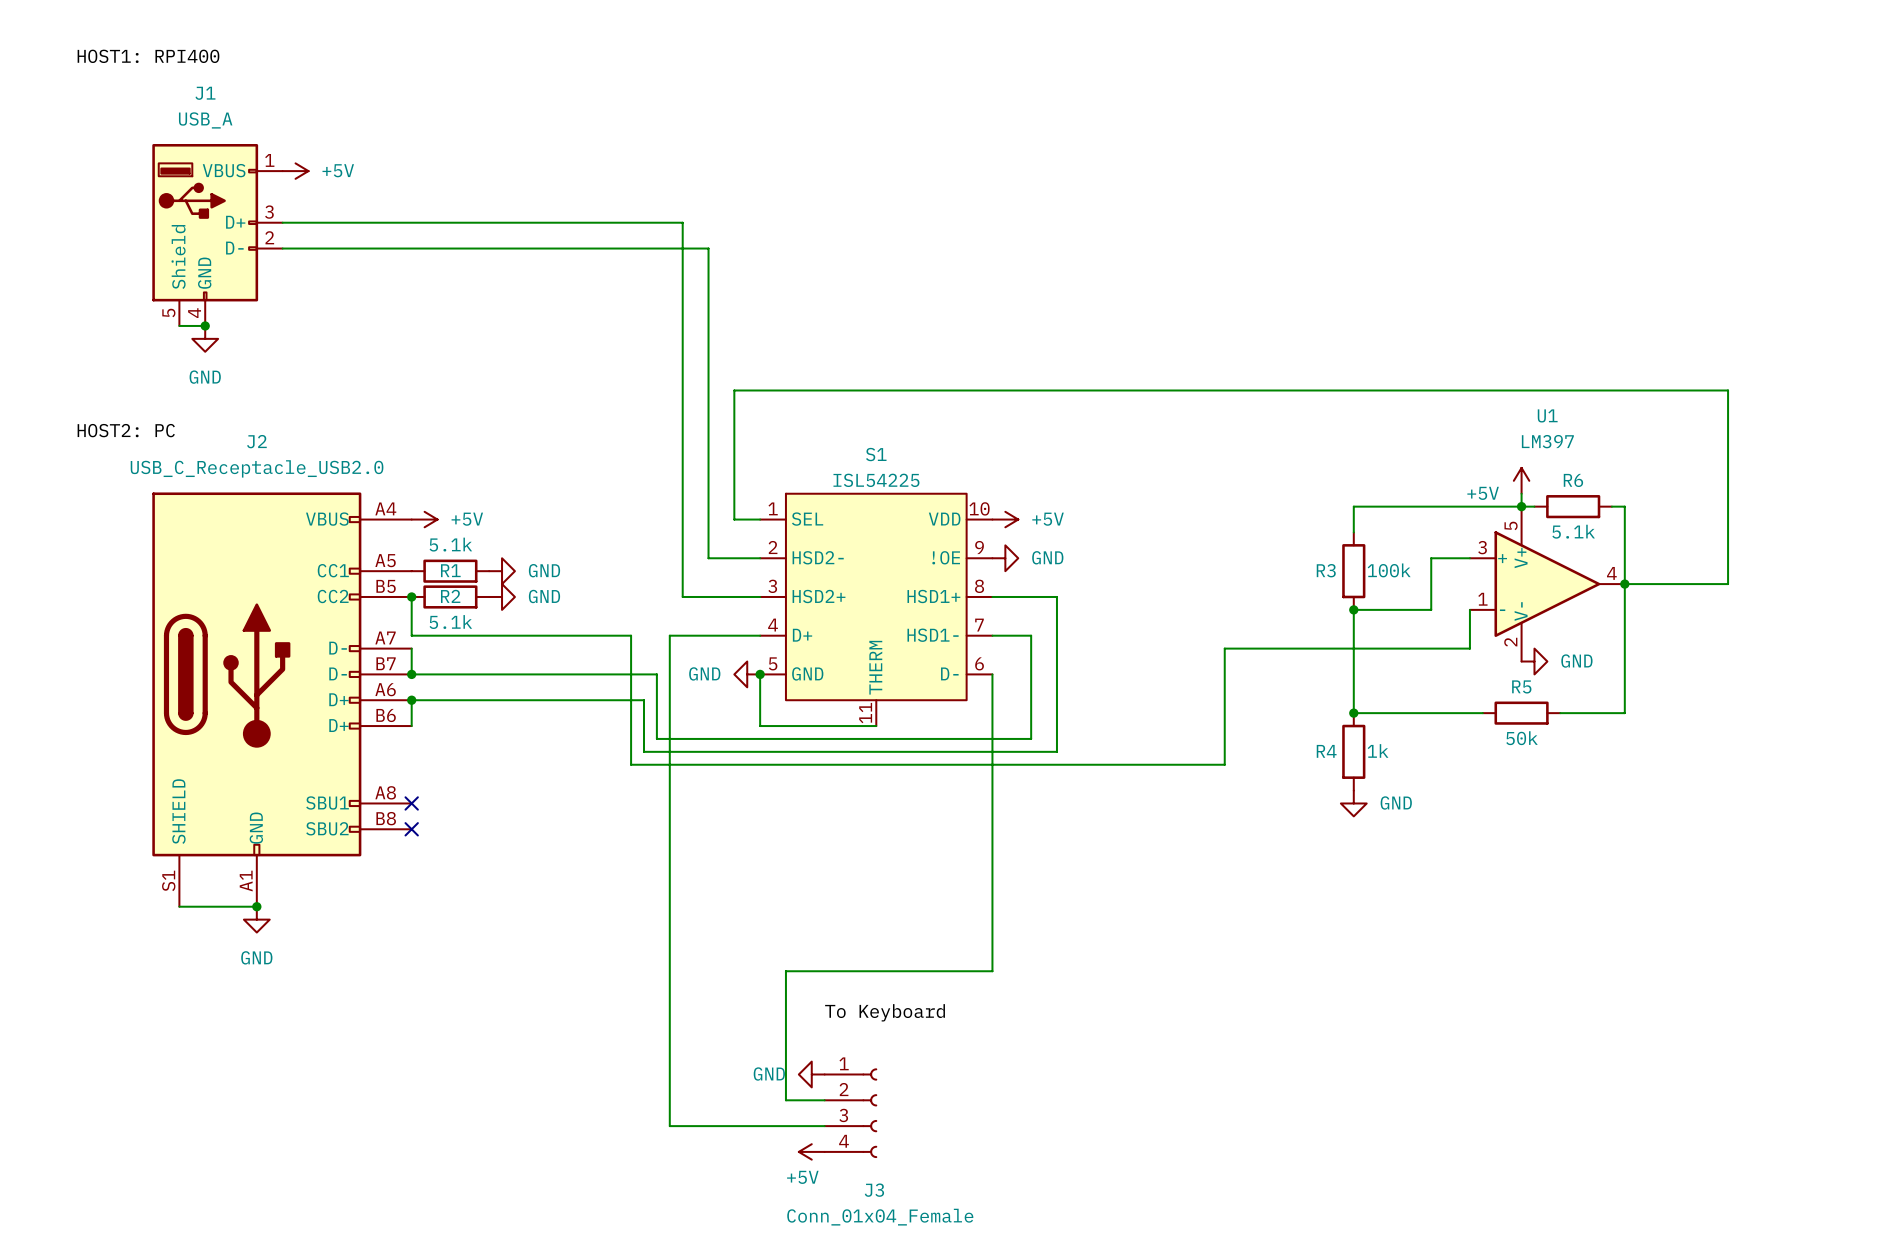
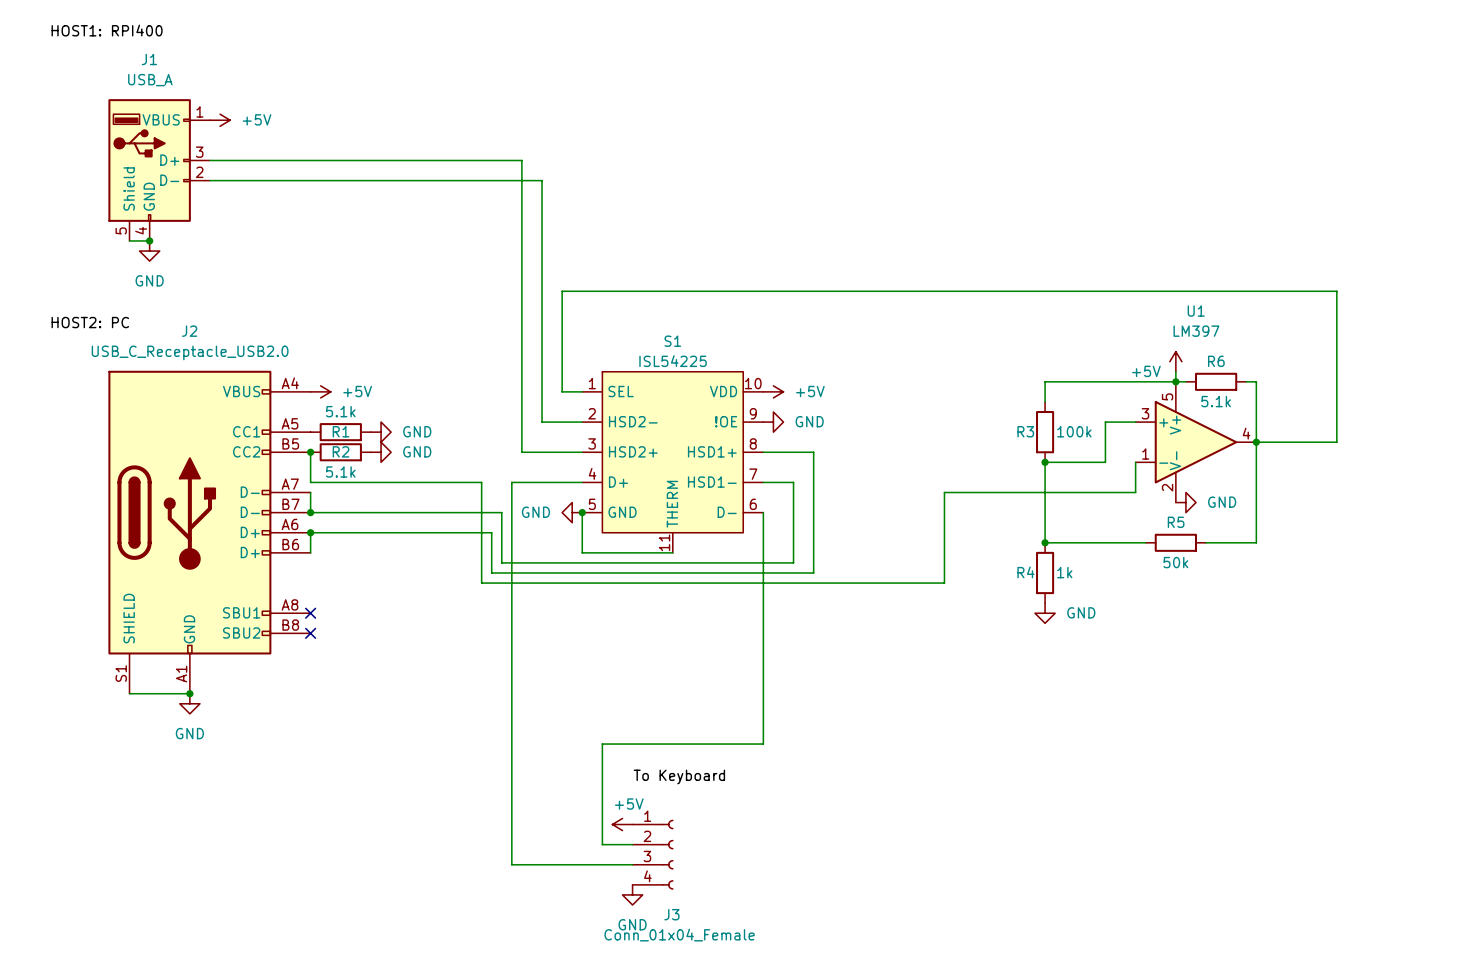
power symbol: GND (811, 1074) -> +5V (622, 824)
power symbol: +5V (811, 1151) -> none
power symbol: none -> GND (632, 894)

